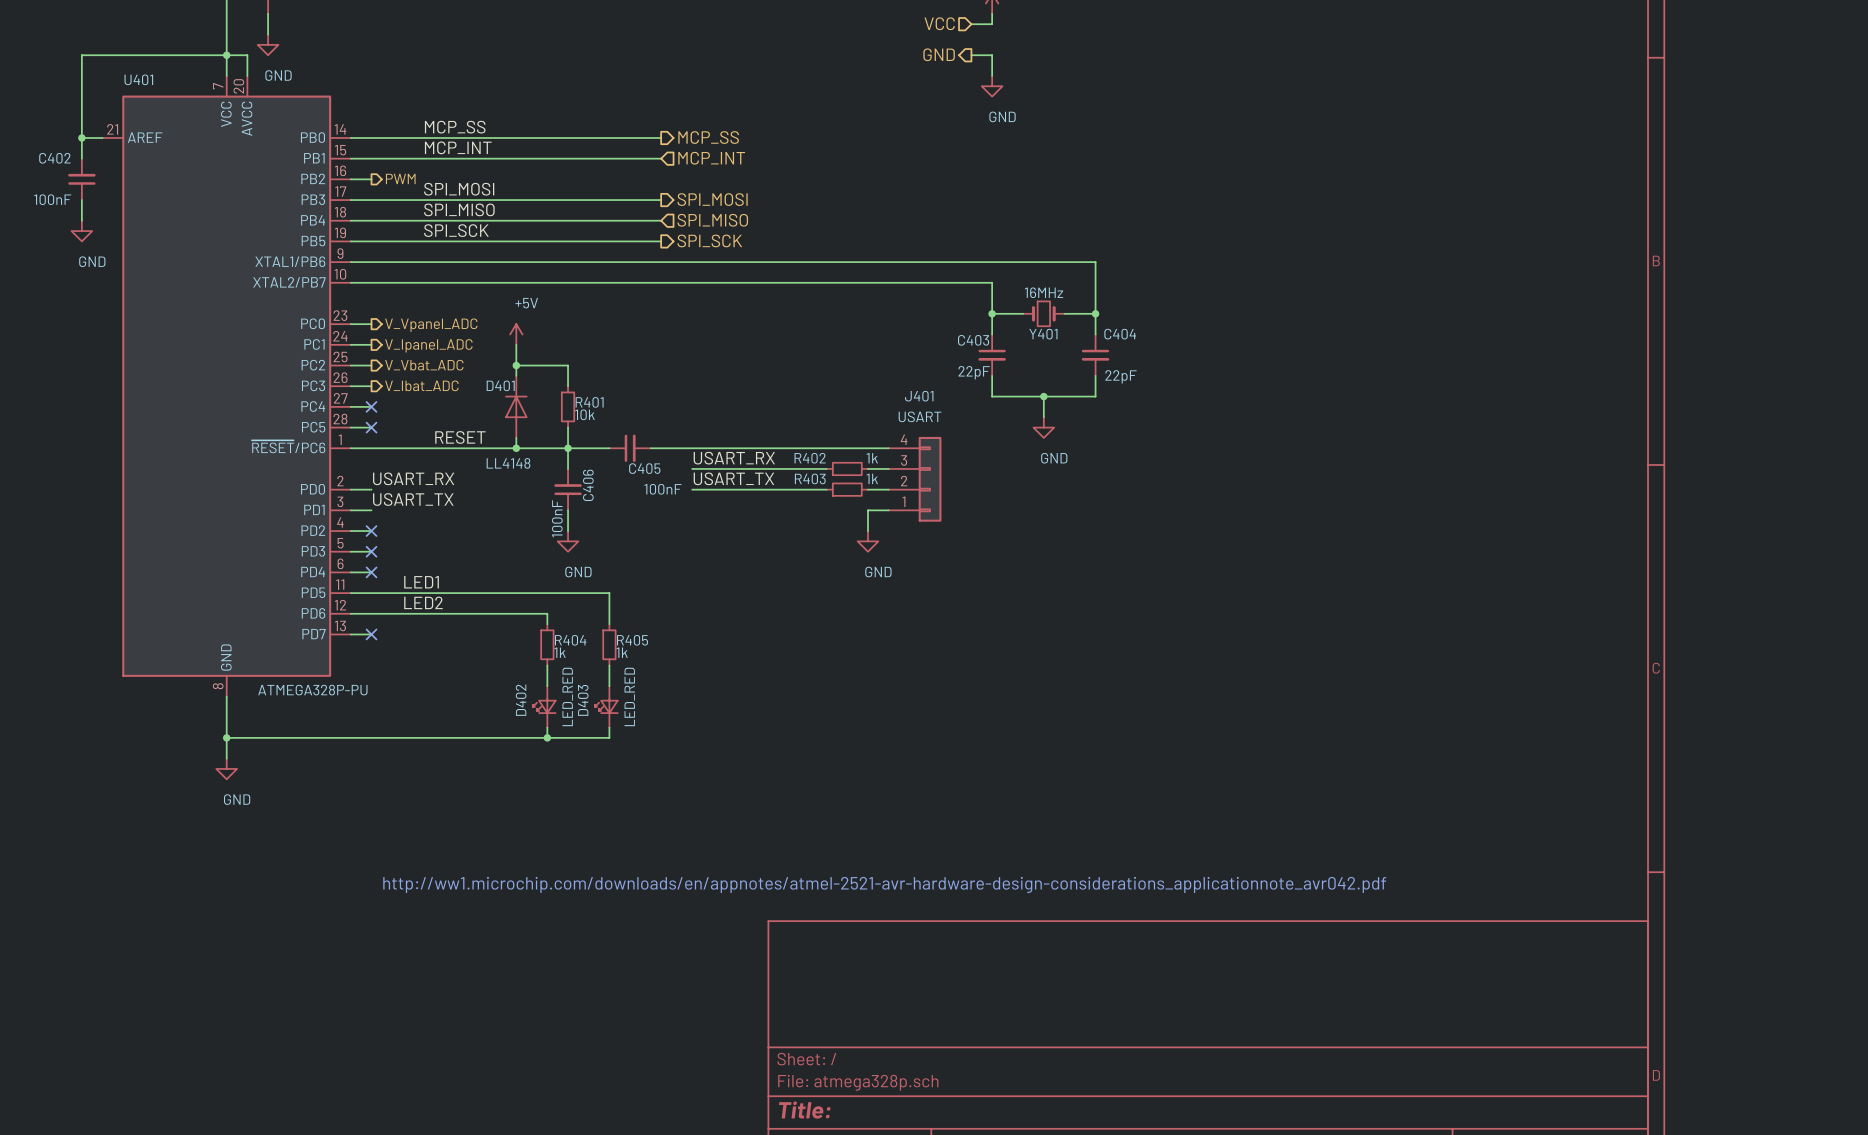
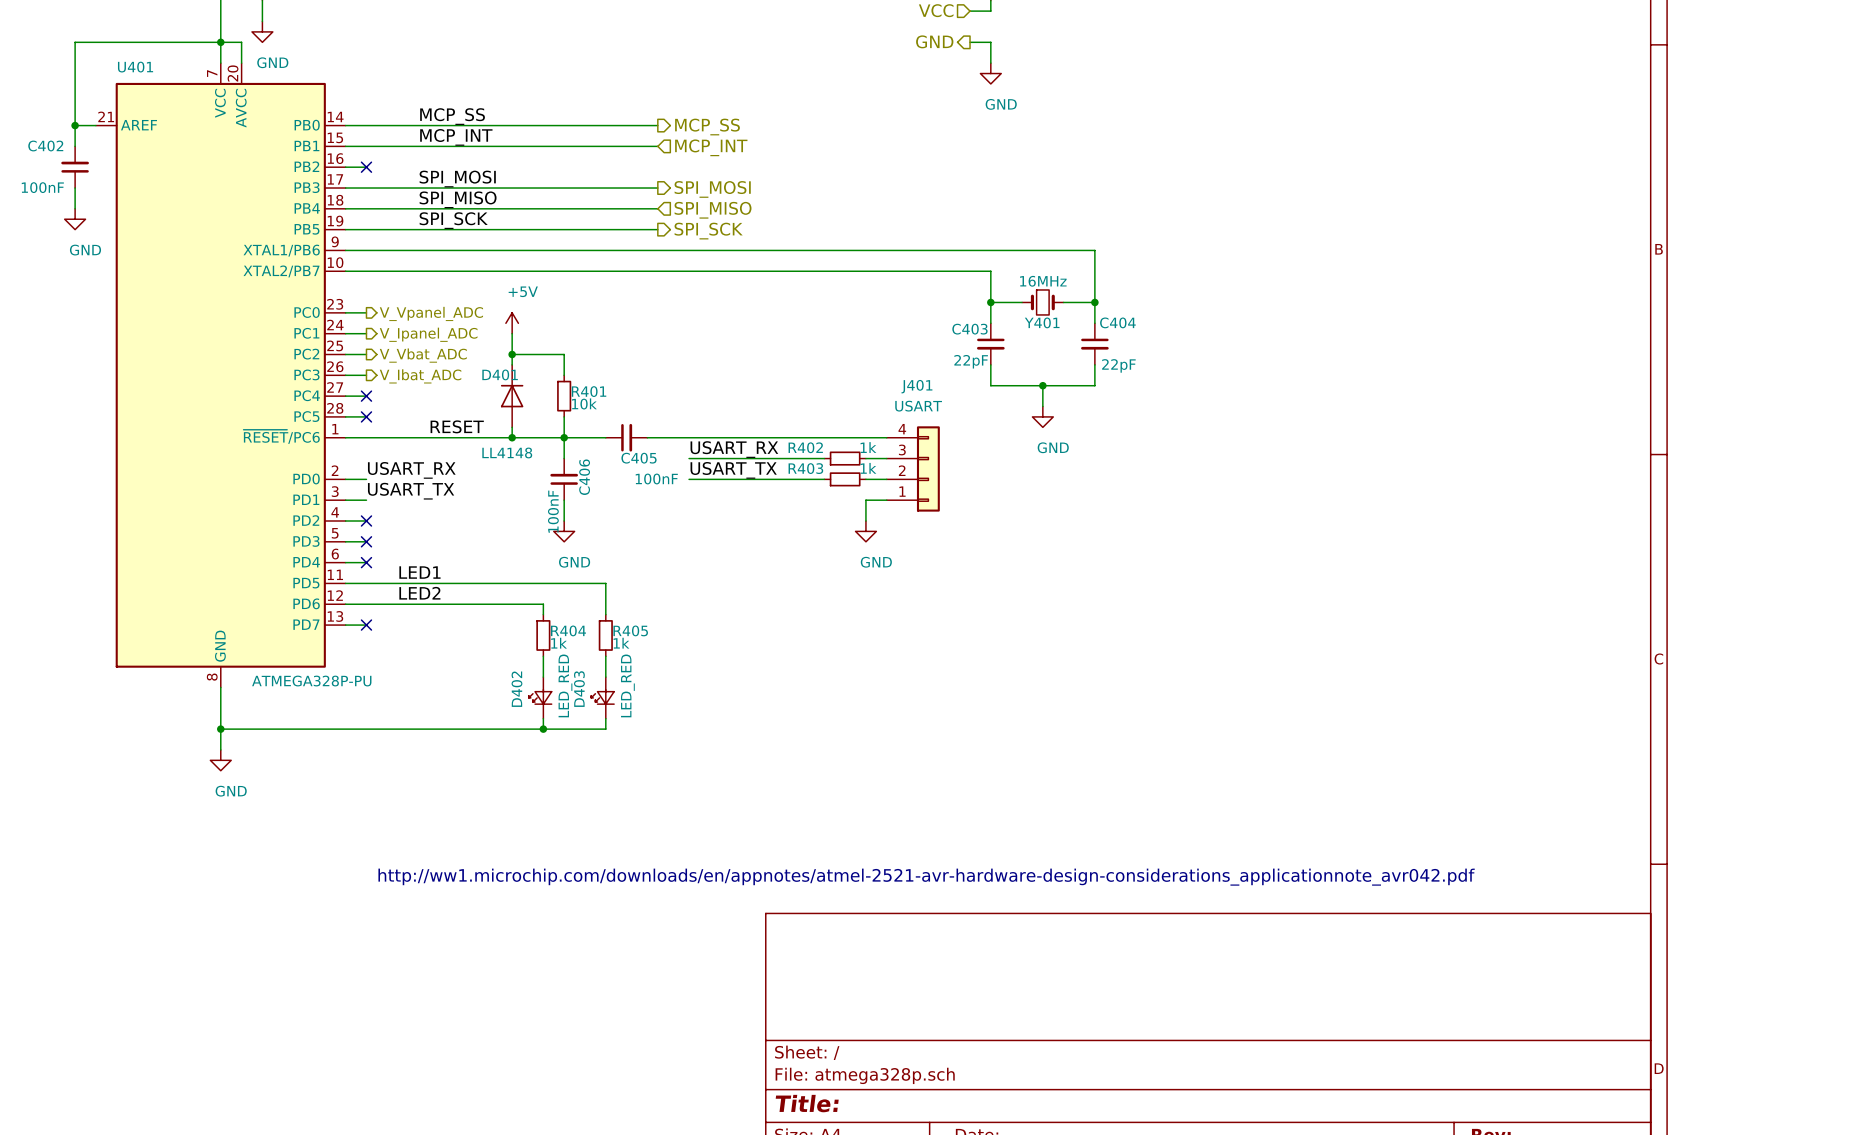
hierarchical label: PWM (400, 178) -> none
no-connect mark: none -> (366, 167)

